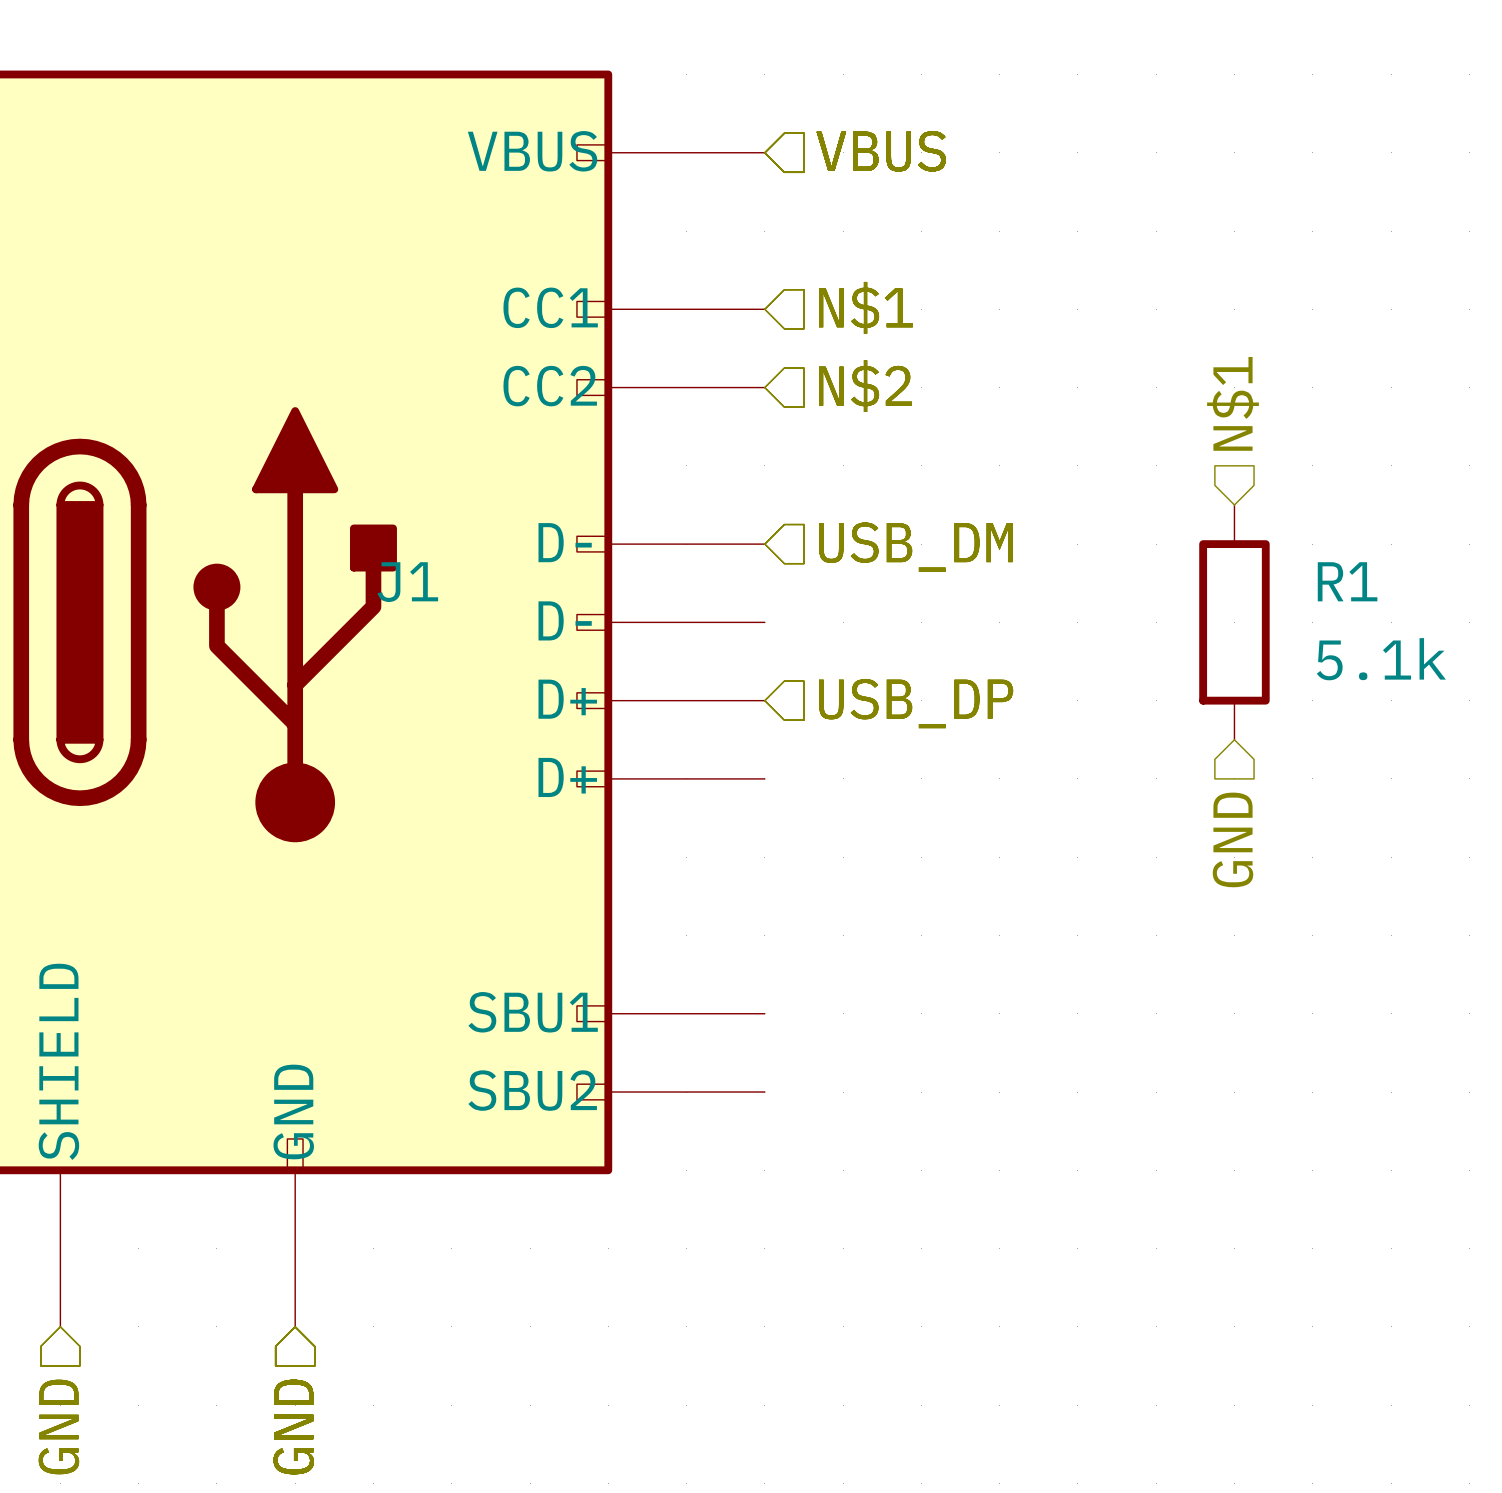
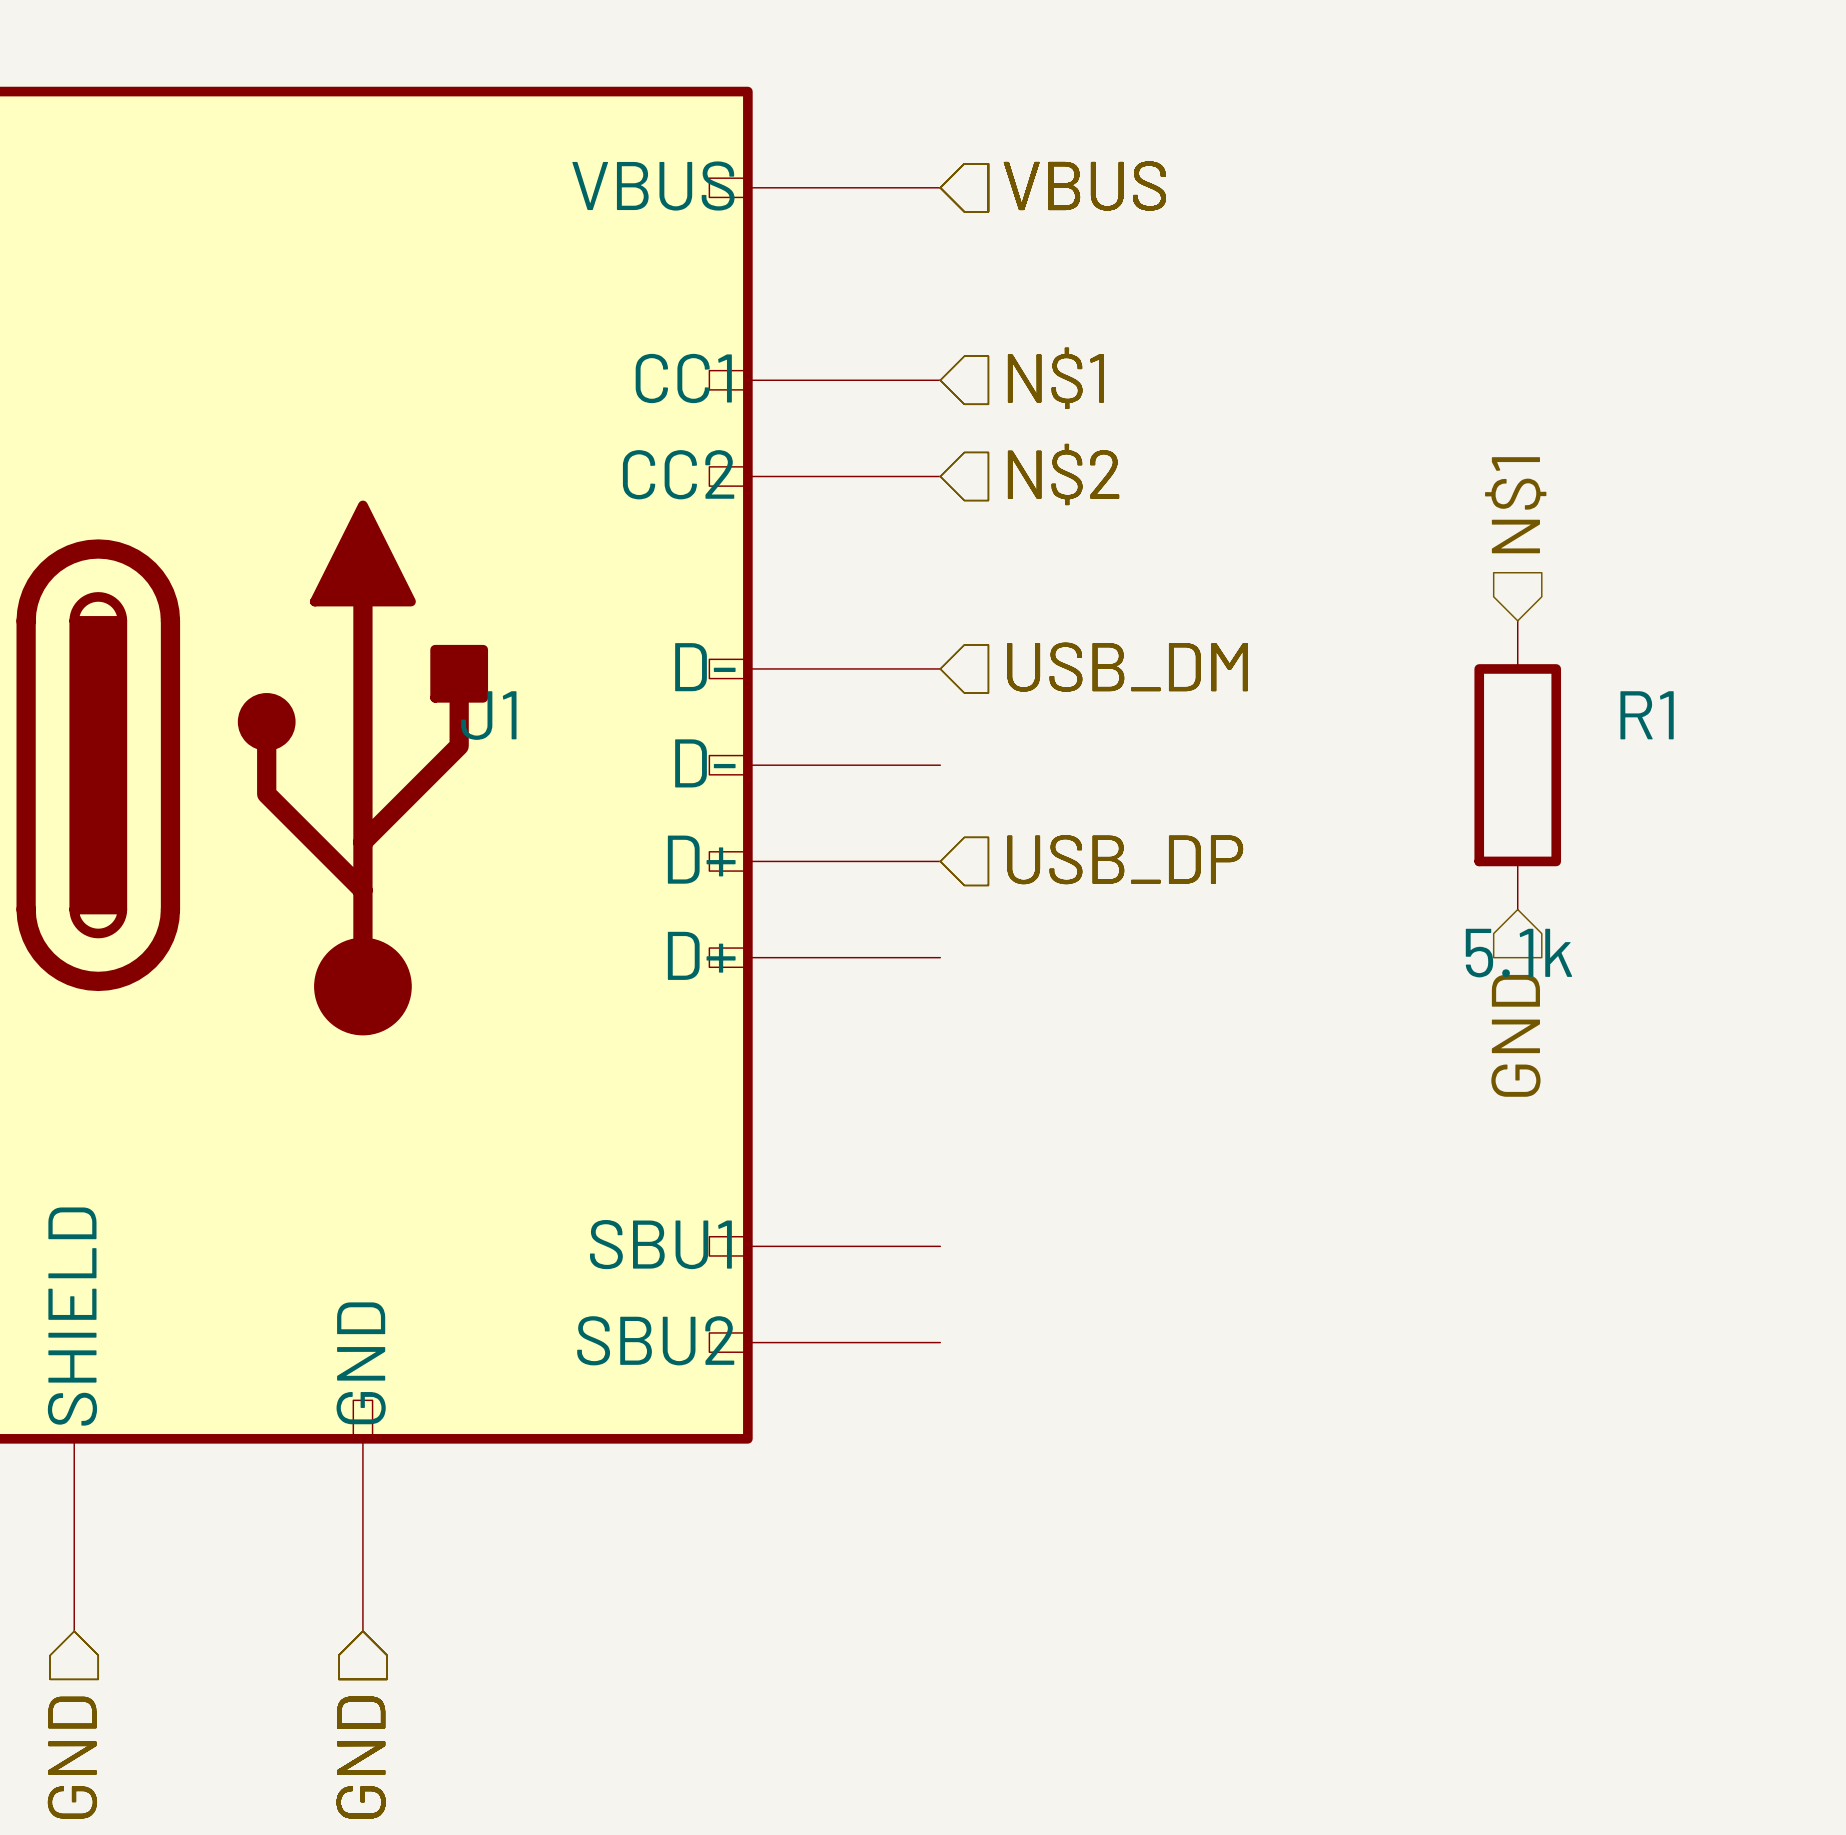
R1 value position: 5.1k (1381, 659) -> 5.1k (1518, 953)

